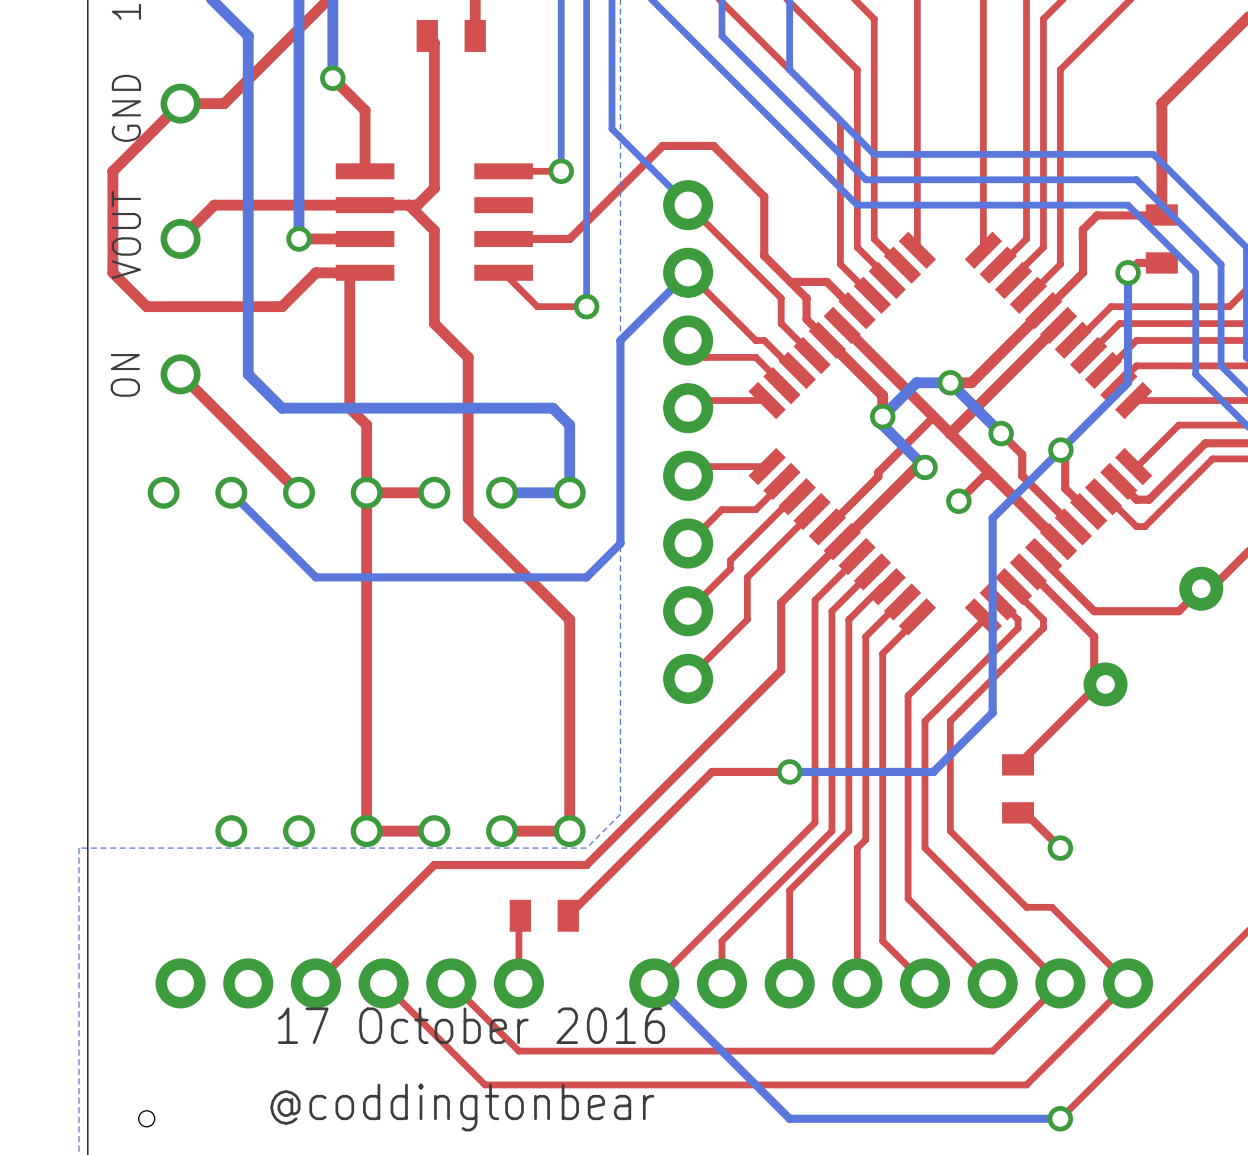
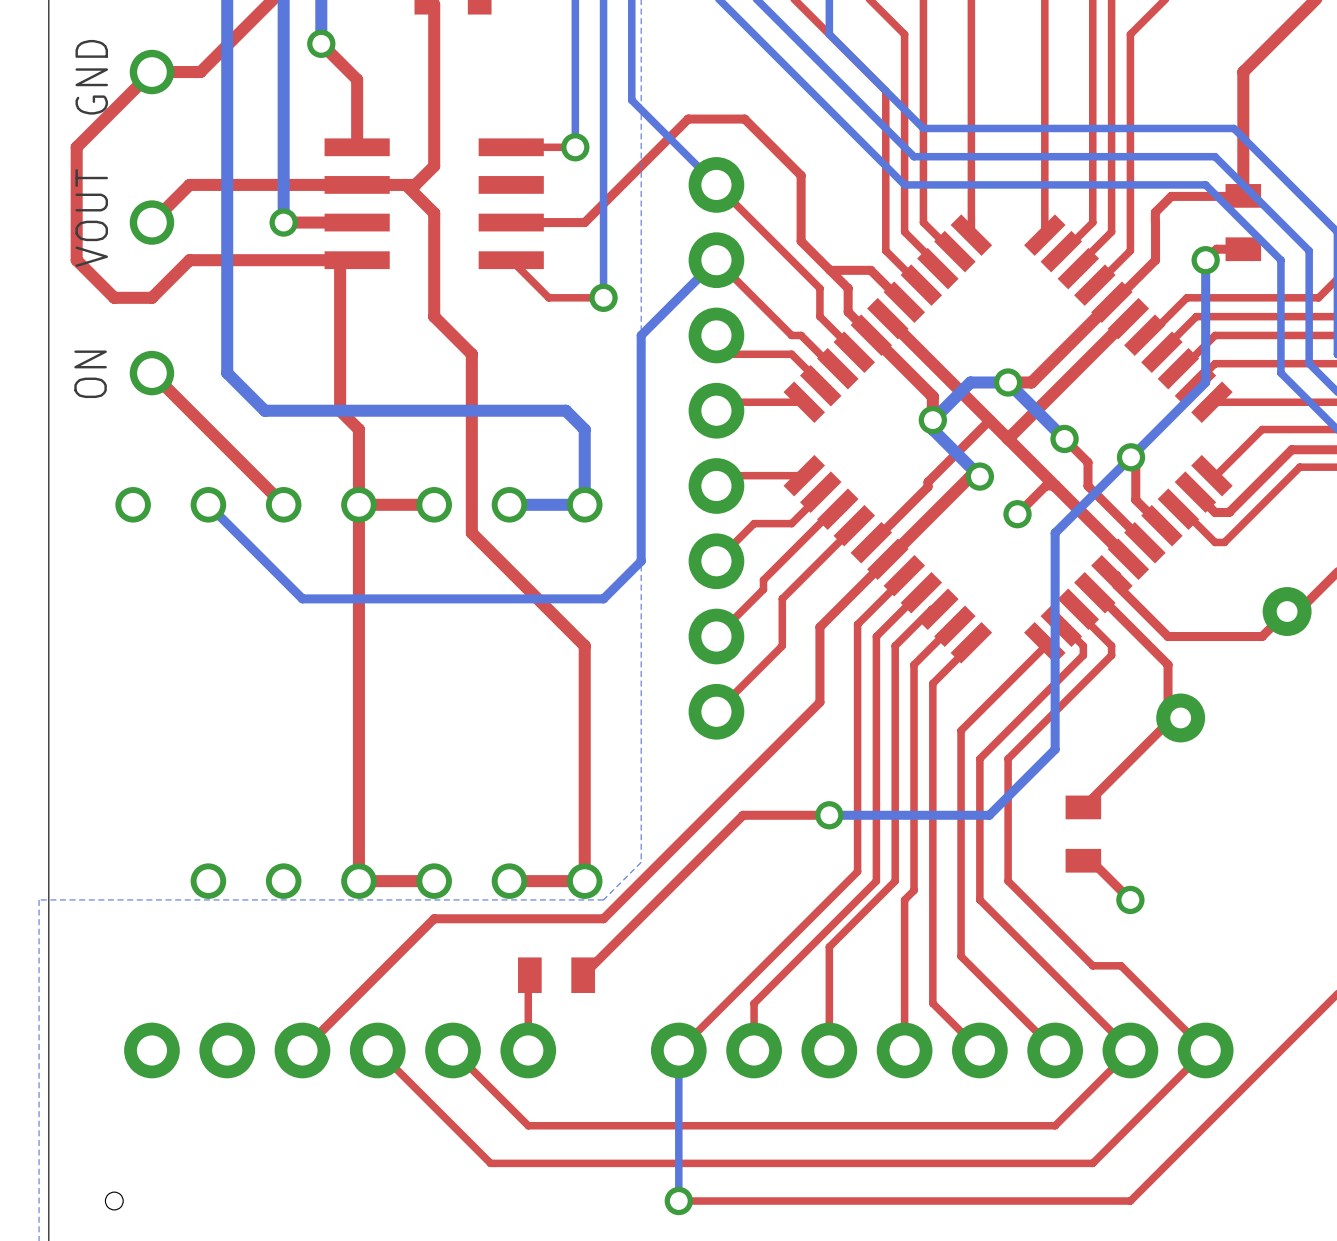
top track: (315, 272) (282, 306) (180, 306) -> (302, 260) (189, 260) (151, 297)
bottom track: (654, 983) (789, 1118) (1060, 1118) -> (678, 1050) (678, 1201)
text: 17 October 2016 (471, 1025) -> none
text: @coddingtonbear (462, 1107) -> none
via: none -> (678, 1201)
top track: none -> (1130, 1201) (678, 1201)
via: (1060, 1118) -> none

